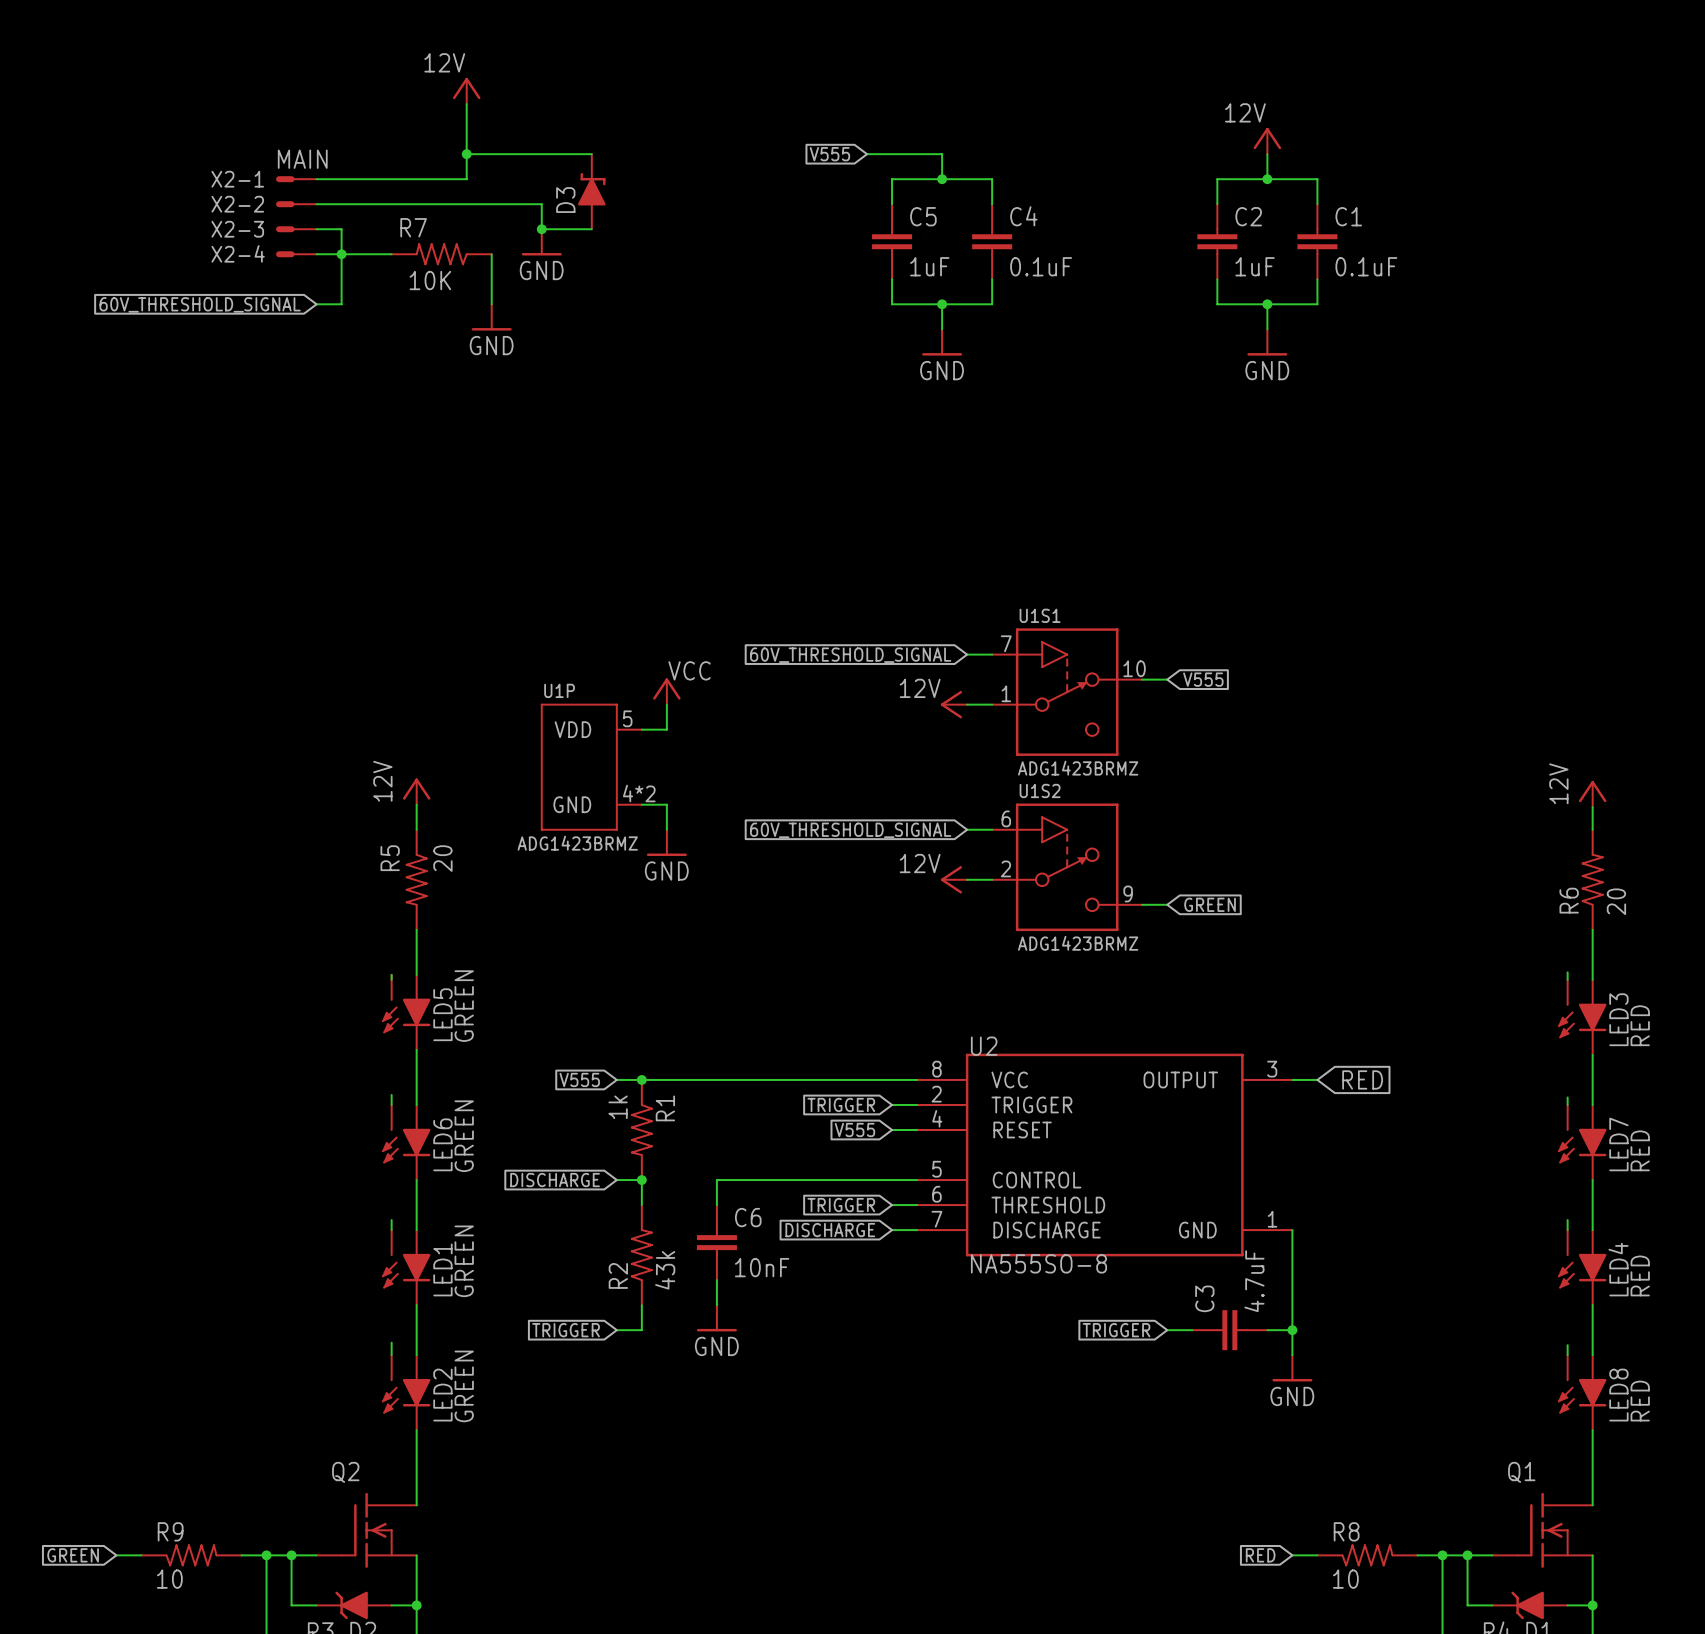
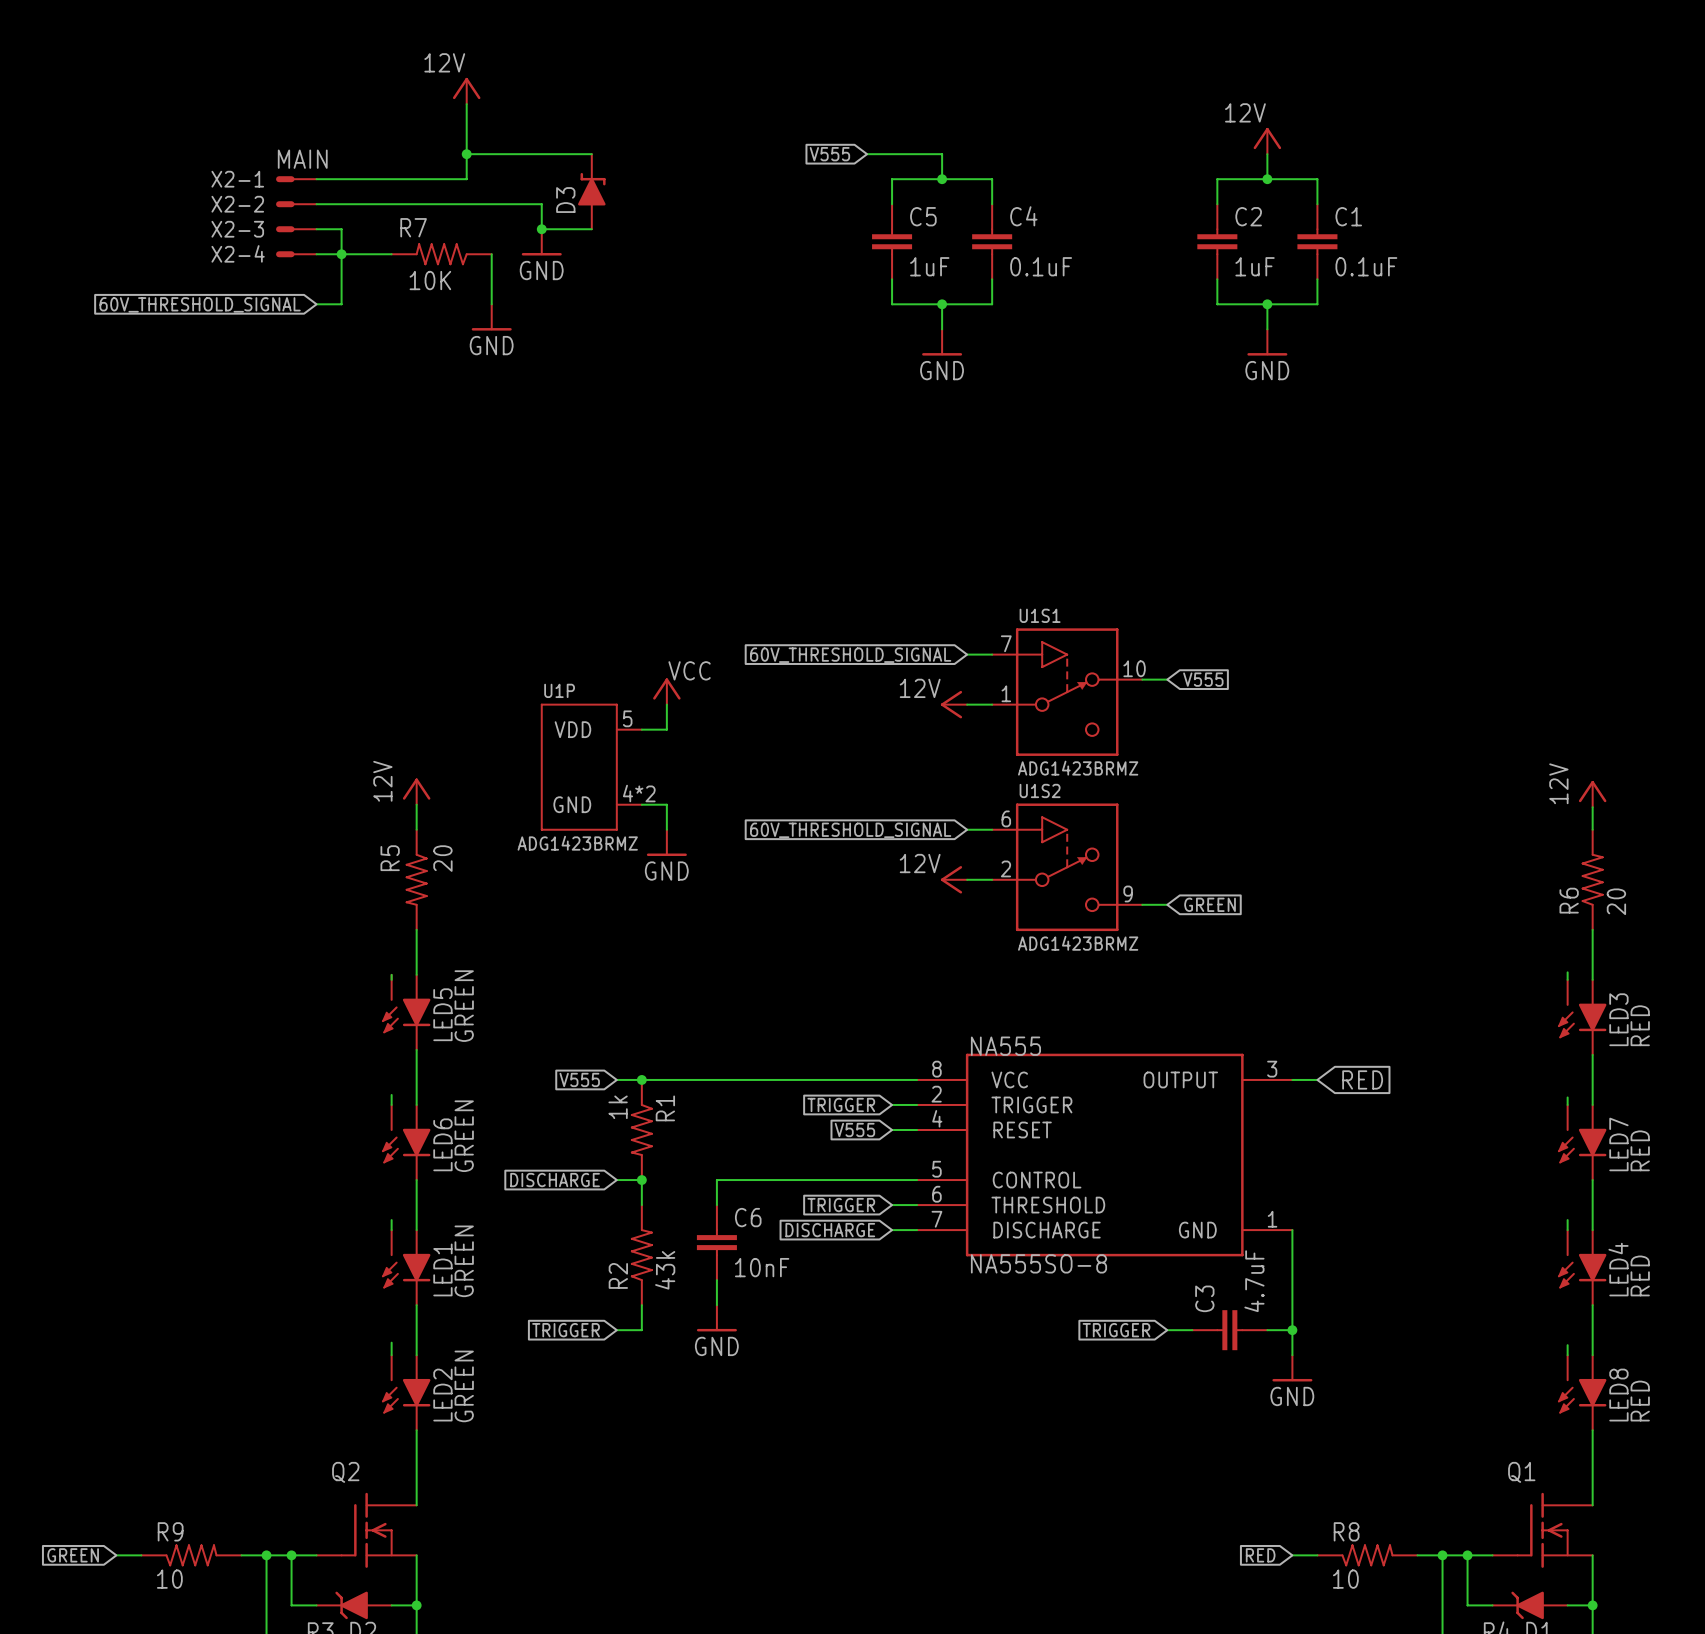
U2 name: U2 (984, 1046) -> NA555 (1005, 1046)

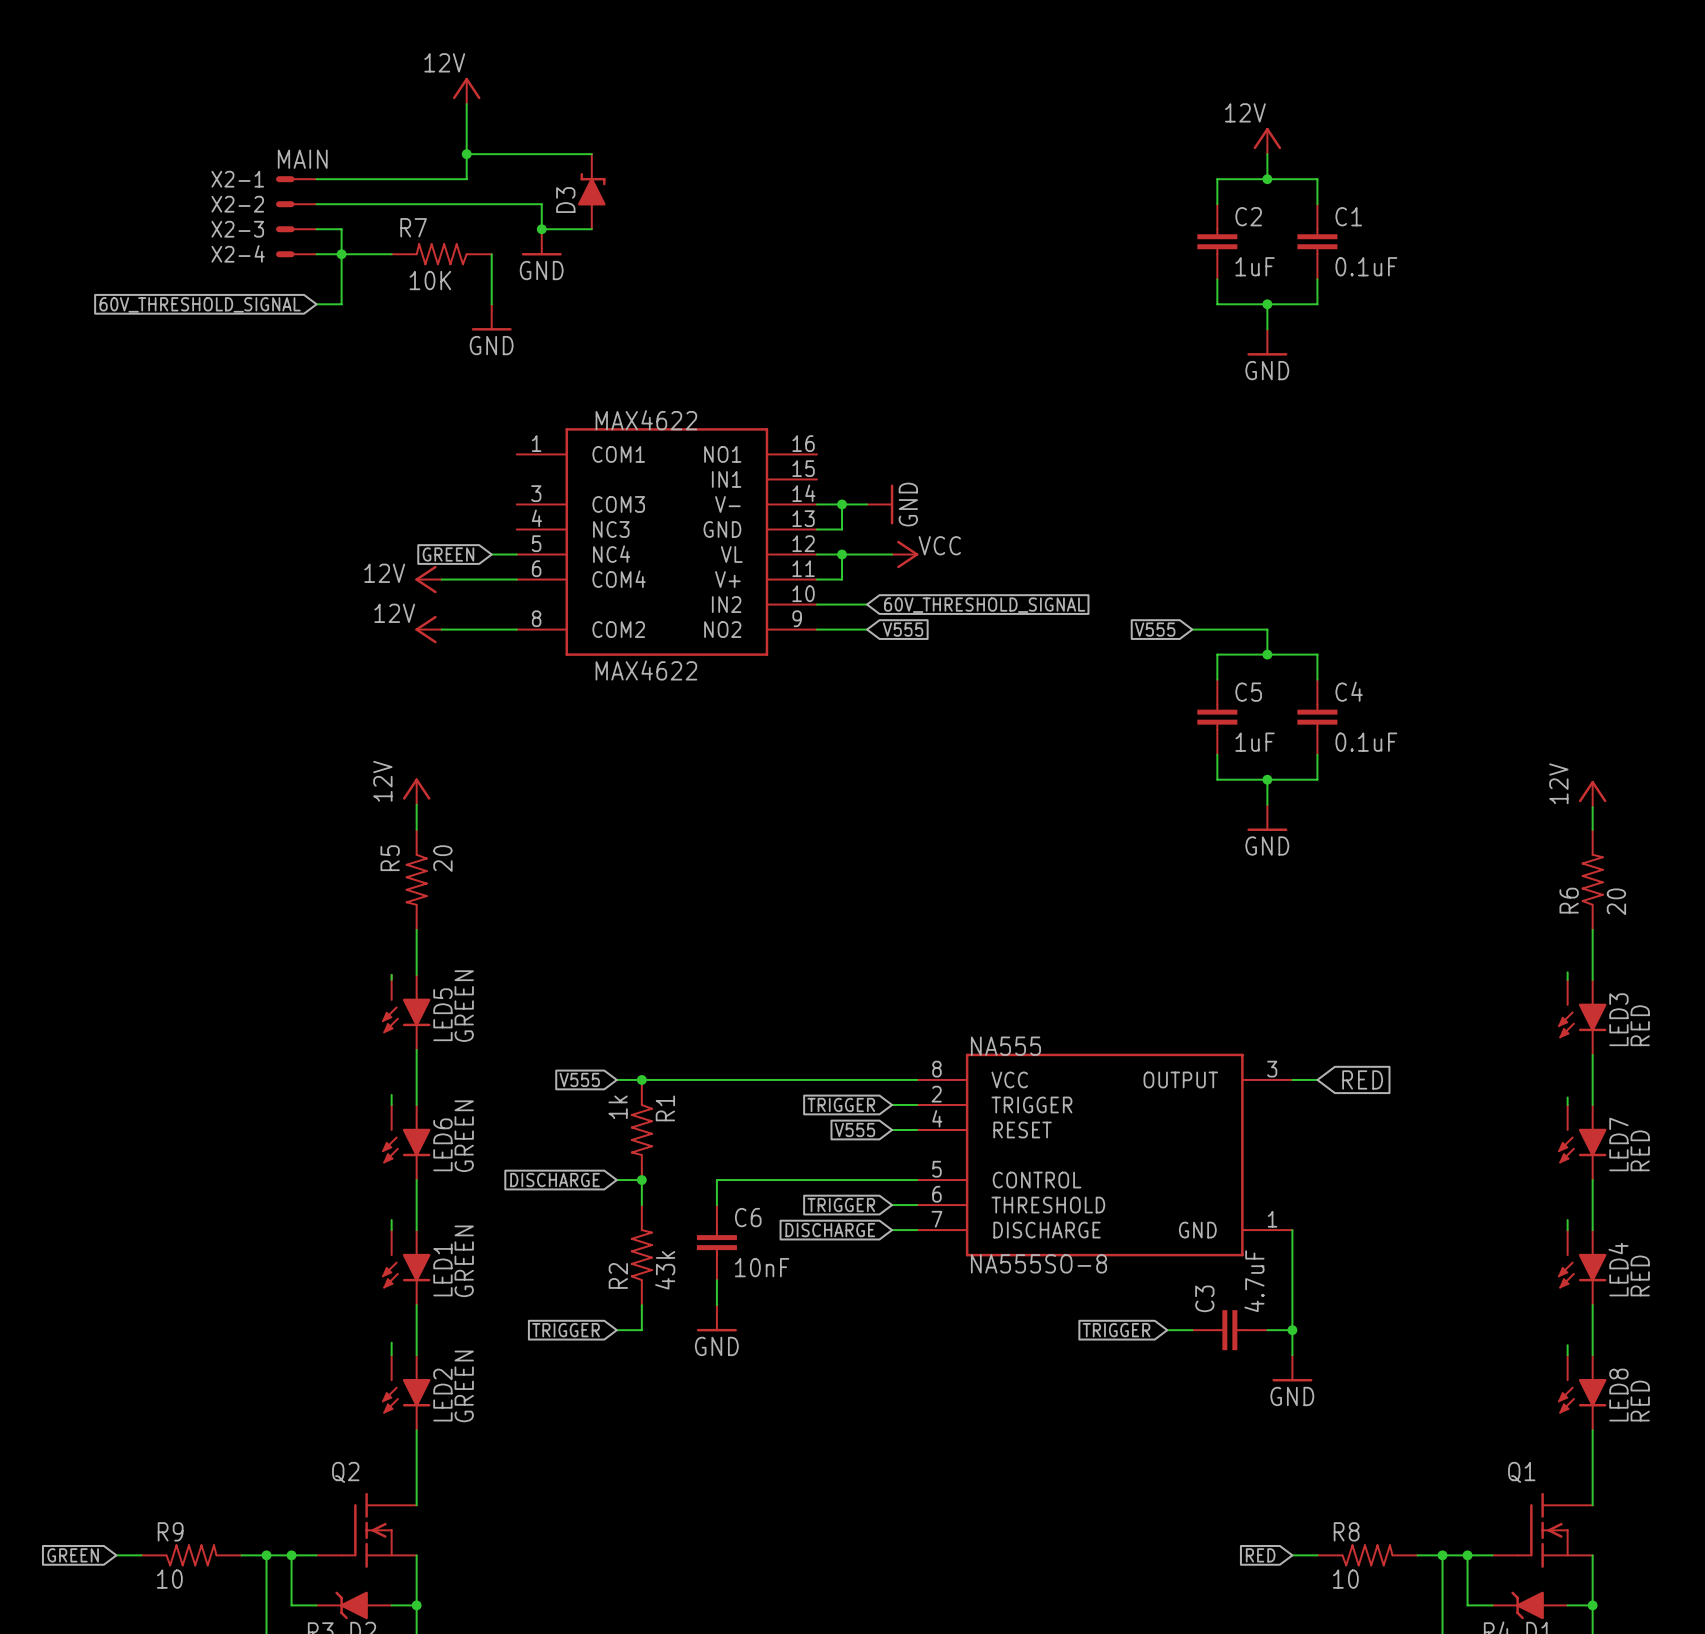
global label: V555 (829, 154) -> none
wire: (867, 154) (942, 154) (942, 179) -> none
junction: (942, 179) -> none
wire: (892, 204) (892, 179) (992, 179) (992, 204) -> none
C5 position: (892, 241) -> (1217, 717)
C4 position: (992, 241) -> (1317, 717)
wire: (892, 279) (892, 304) (992, 304) (992, 279) -> none
wire: (942, 304) (942, 329) -> none
junction: (942, 304) -> none
power symbol position: GND (942, 342) -> GND (880, 504)
power symbol rotation: 0° (942, 354) -> 90° counterclockwise (892, 504)
wire: none -> (817, 504) (867, 504)
wire: none -> (842, 504) (842, 529) (817, 529)
junction: none -> (842, 504)
MAX4622: none -> MAX4622 (666, 542)
global label: none -> GREEN (448, 554)
wire: none -> (491, 554) (516, 554)
wire: none -> (817, 554) (892, 554)
junction: none -> (842, 554)
power symbol: none -> VCC (905, 554)
power symbol: none -> 12V (428, 579)
wire: none -> (441, 579) (516, 579)
wire: none -> (817, 604) (867, 604)
power symbol: none -> 12V (428, 629)
wire: none -> (441, 629) (516, 629)
wire: none -> (817, 629) (867, 629)
global label: none -> V555 (903, 629)
wire: none -> (1192, 629) (1267, 629) (1267, 654)
wire: (967, 654) (992, 654) -> none
junction: none -> (1267, 654)
global label rotation: 0° (850, 655) -> 180° (984, 605)
wire: (1142, 679) (1167, 679) -> none
global label rotation: 0° (1203, 679) -> 180° (1155, 629)
wire: none -> (1217, 679) (1217, 654) (1317, 654) (1317, 679)
power symbol: VCC (666, 691) -> none
U1S1: (1067, 692) -> none
wire: (666, 704) (666, 729) (641, 729) -> (842, 554) (842, 579) (817, 579)
power symbol: 12V (953, 704) -> none
wire: (967, 704) (992, 704) -> none
wire: none -> (1217, 754) (1217, 779) (1317, 779) (1317, 754)
U1P: (591, 767) -> none
wire: none -> (1267, 779) (1267, 804)
junction: none -> (1267, 779)
wire: (641, 804) (666, 804) (666, 829) -> none
power symbol: none -> GND (1267, 817)
wire: (967, 829) (992, 829) -> none
global label: 60V_THRESHOLD_SIGNAL (850, 830) -> none
power symbol: GND (666, 842) -> none
U1S2: (1067, 867) -> none
power symbol: 12V (953, 879) -> none
wire: (967, 879) (992, 879) -> none
wire: (1142, 904) (1167, 904) -> none
global label: GREEN (1210, 904) -> none

